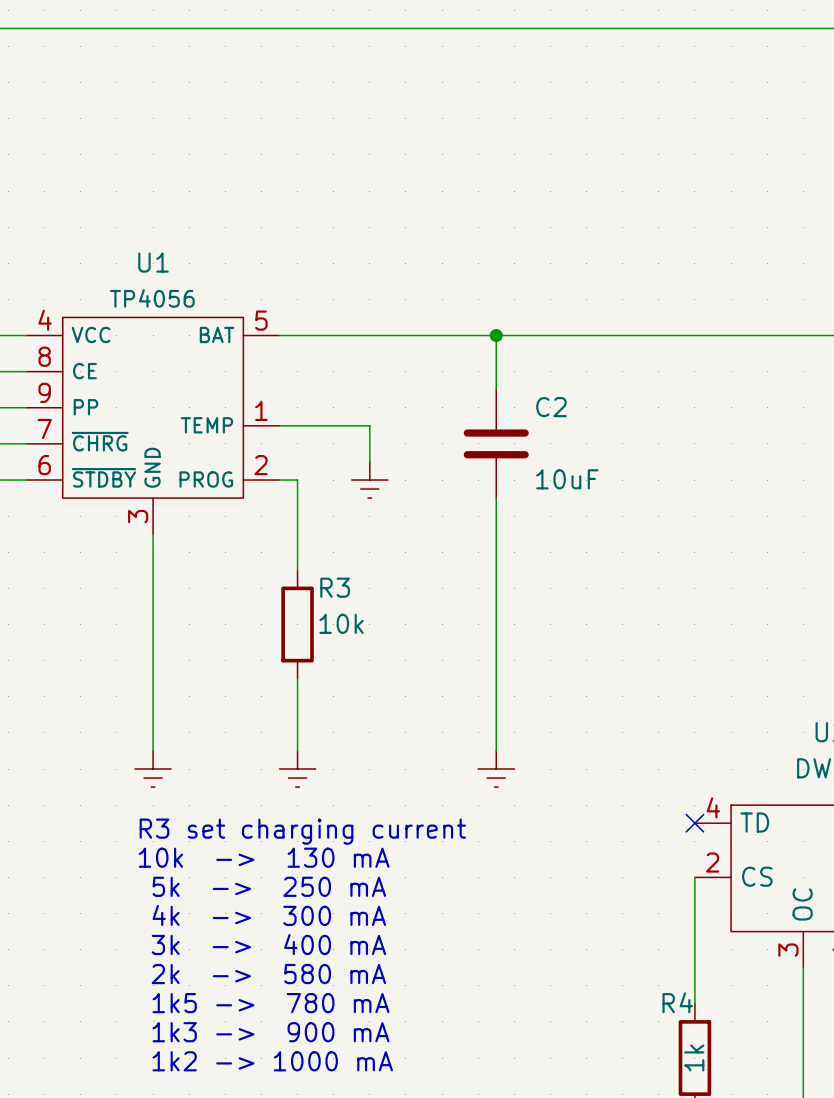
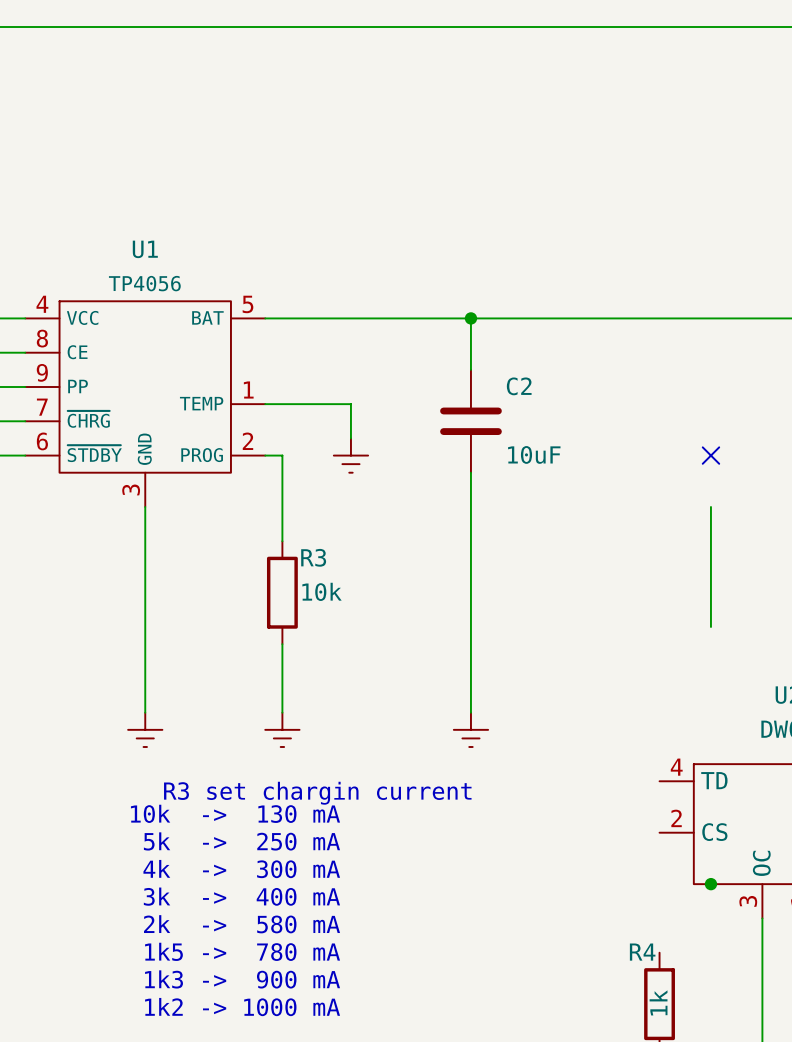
no-connect mark: none -> (710, 455)
no-connect mark: (694, 823) -> none
text: R3 set charging current (302, 831) -> R3 set chargin current (317, 793)
wire: (694, 877) (694, 1003) -> (710, 507) (710, 627)
junction: none -> (710, 884)

